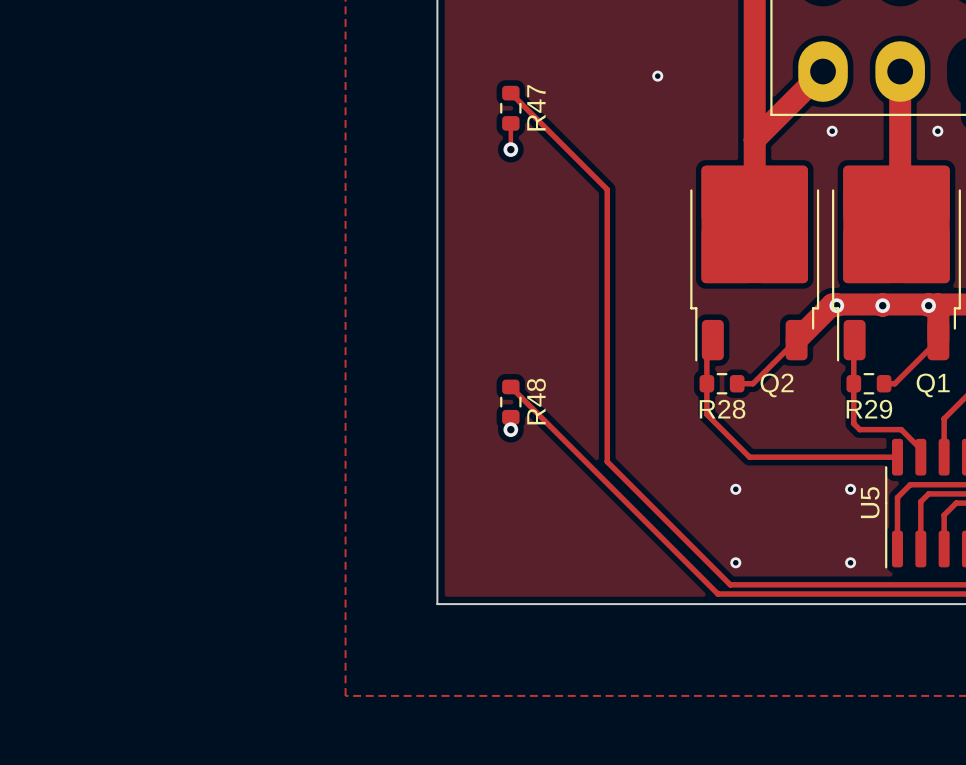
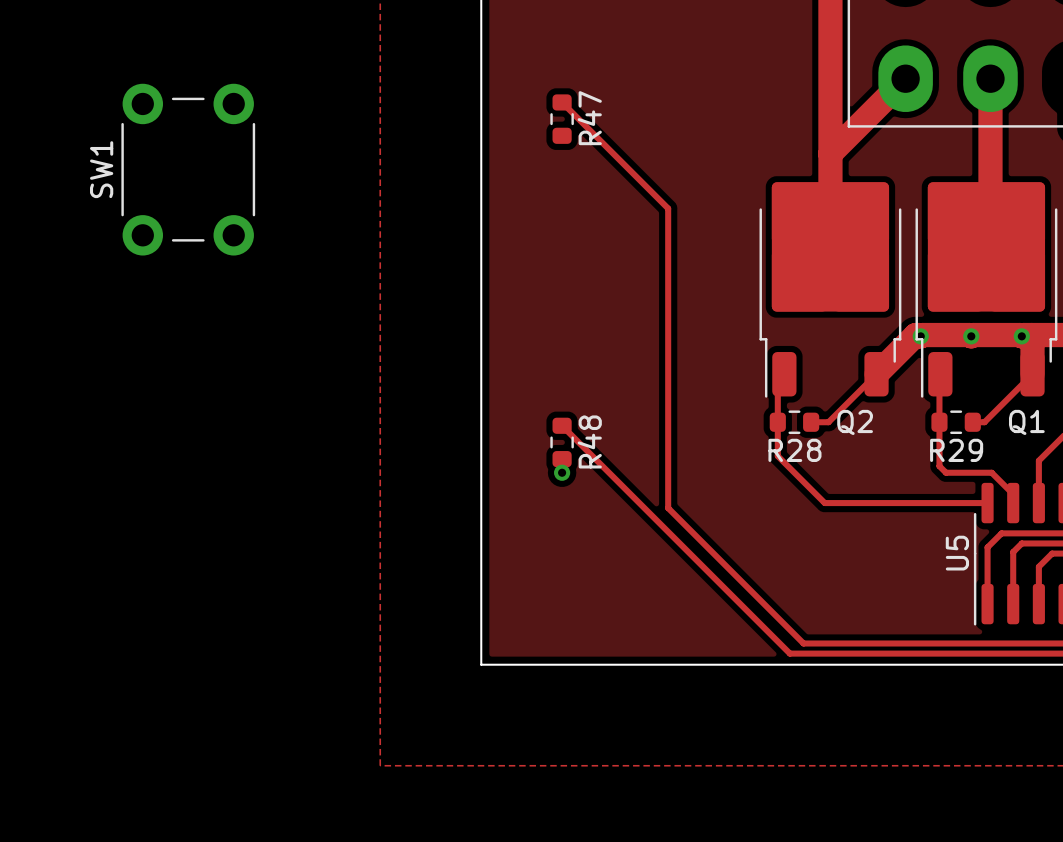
via: (657, 76) -> none
track: (510, 123) (510, 149) -> none
via: (832, 131) -> none
via: (937, 131) -> none
via: (510, 149) -> none
SW1: none -> (188, 169)
via: (735, 489) -> none
via: (850, 489) -> none
via: (735, 562) -> none
via: (850, 562) -> none

